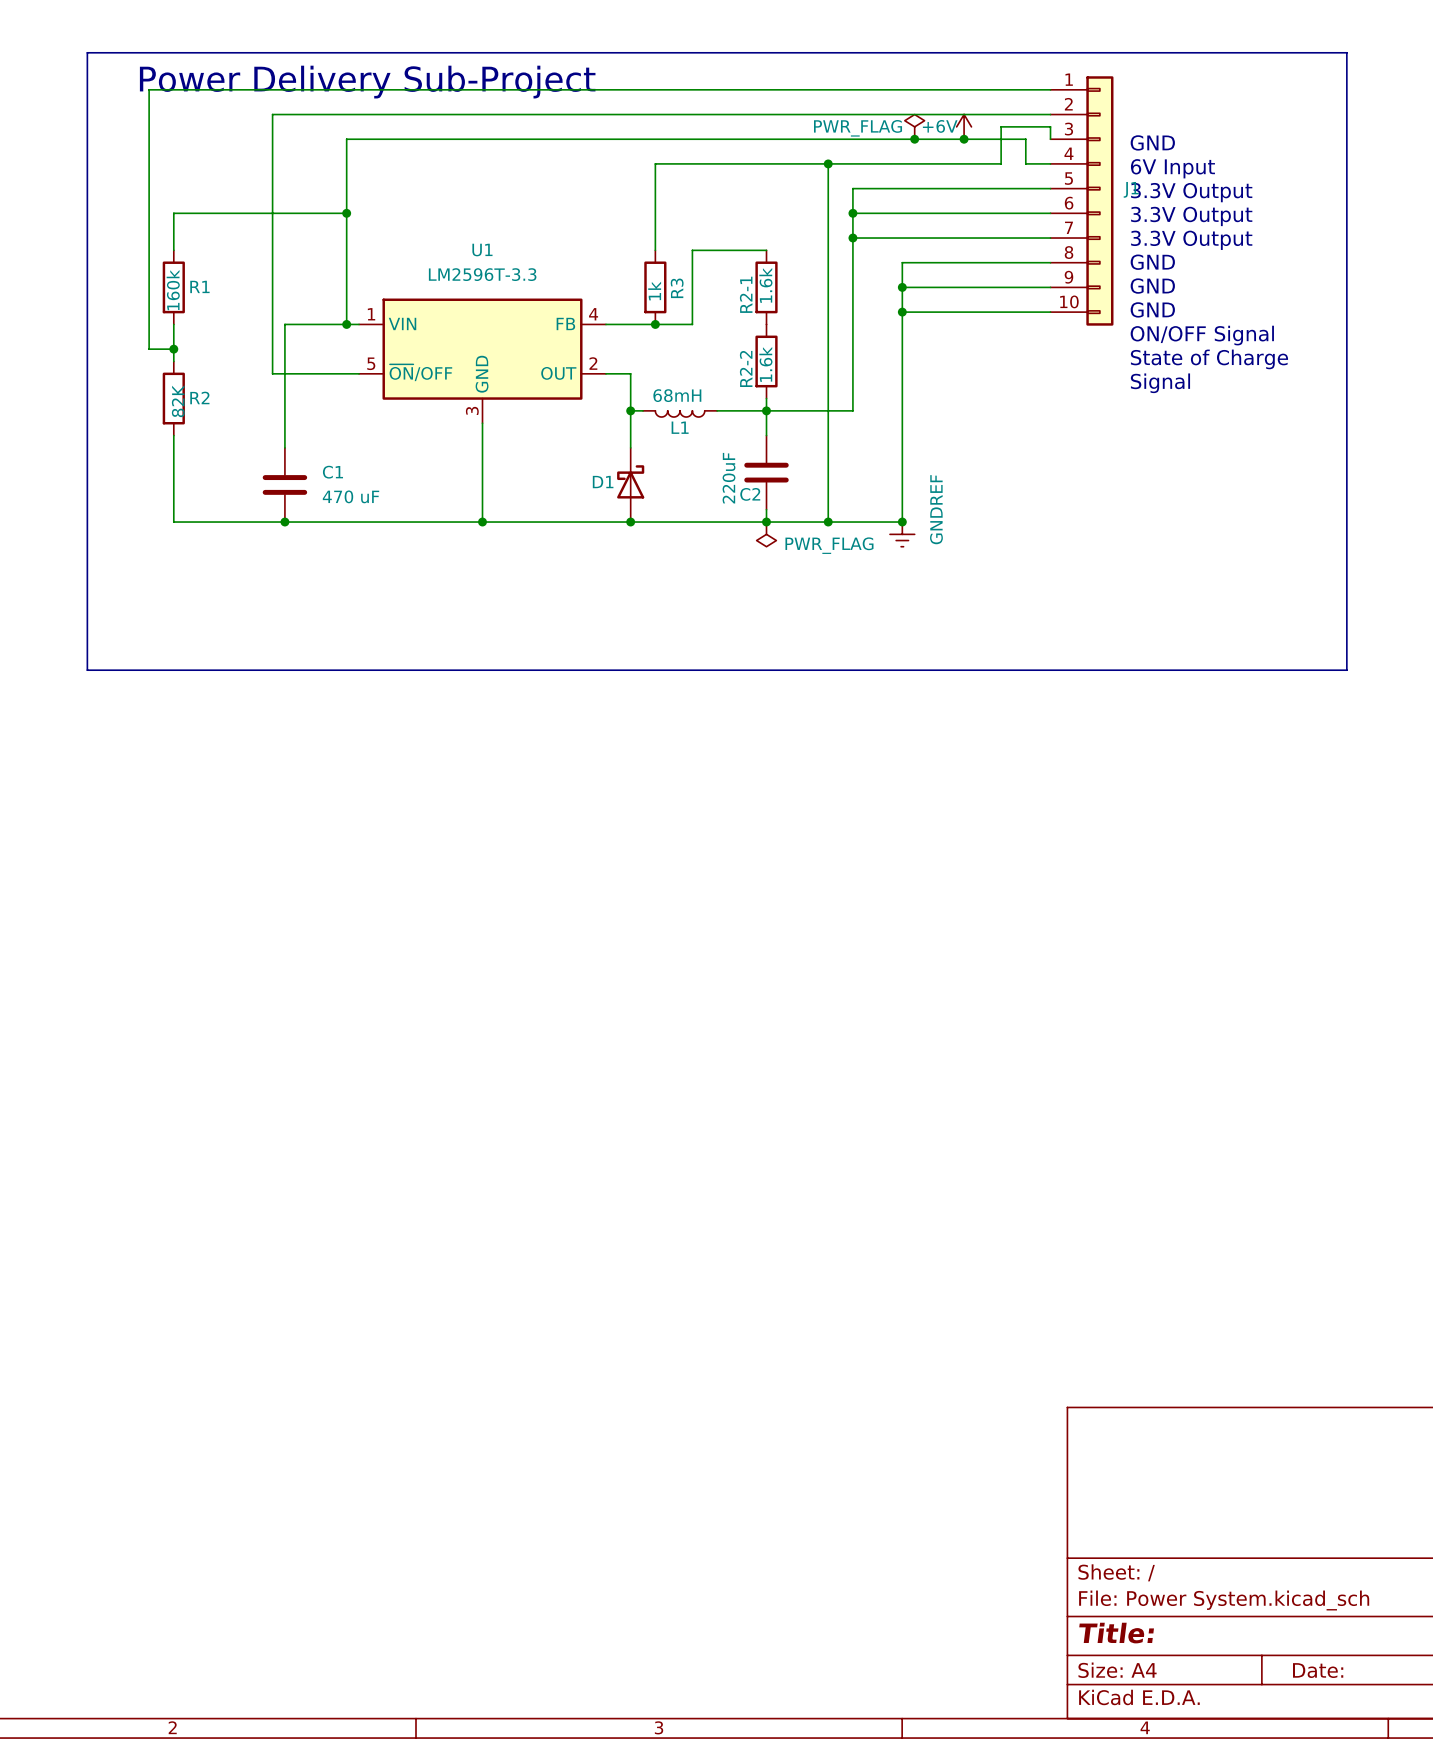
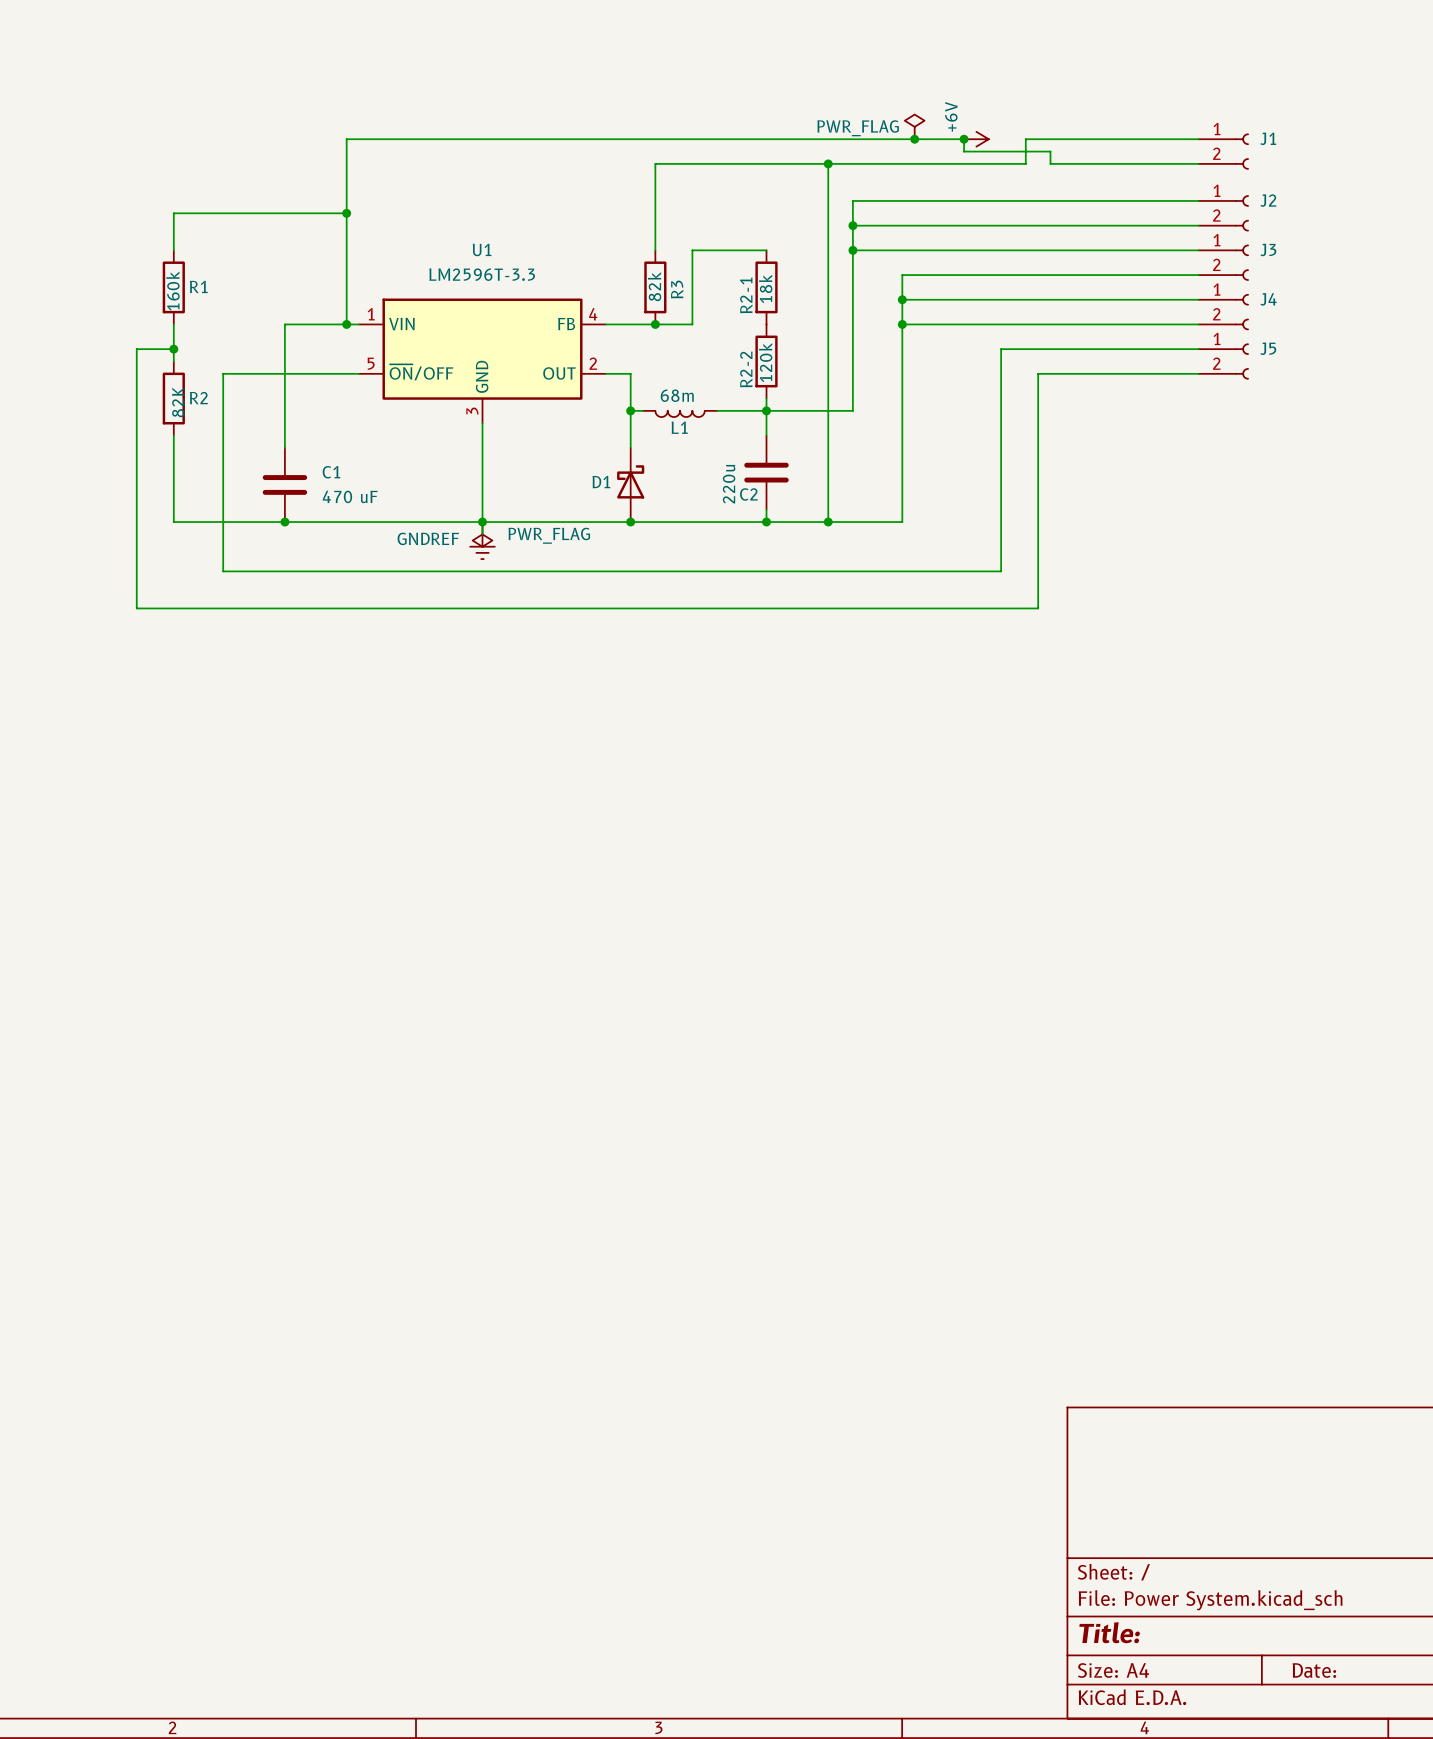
line: (87, 52) (1346, 52) (1346, 670) (87, 670) (87, 52) -> none
J1 symbol: [1050, 76, 1114, 326] -> [1198, 133, 1249, 170]
text: Power Delivery Sub-Project (367, 82) -> none
wire: (1050, 89) (149, 89) (149, 349) -> (1198, 373) (1038, 373) (1038, 608) (136, 608) (136, 349) (149, 349)
wire: (1050, 114) (272, 114) (272, 373) -> (1198, 349) (1001, 349) (1001, 571) (223, 571) (223, 373) (272, 373)
power symbol text position: +6V (940, 126) -> +6V (951, 116)
power symbol rotation: 0° (964, 126) -> 90° clockwise (976, 139)
power symbol position: +6V (964, 126) -> +6V (976, 139)
wire: (964, 139) (1025, 139) -> (964, 139) (964, 151) (1050, 151) (1050, 163) (1198, 163)
wire: none -> (1025, 139) (1198, 139)
wire: (1050, 139) (1050, 126) (1001, 126) (1001, 163) -> (1025, 163) (1001, 163)
text: GND (1152, 142) -> none
wire: (1025, 163) (1050, 163) -> none
text: 6V Input (1172, 168) -> none
wire: (1050, 188) (852, 188) (852, 200) -> (1198, 200) (852, 200)
text: 3.3V Output (1191, 192) -> none
wire: (852, 213) (1050, 213) -> none
junction: (852, 213) -> none
J2: none -> (1223, 213)
text: 3.3V Output (1191, 216) -> none
wire: none -> (852, 225) (1198, 225)
junction: none -> (852, 225)
wire: (852, 238) (1050, 238) -> none
junction: (852, 238) -> none
text: 3.3V Output (1191, 240) -> none
wire: none -> (852, 250) (1198, 250)
junction: none -> (852, 250)
wire: (1050, 262) (902, 262) (902, 275) -> (1198, 275) (902, 275)
text: GND (1152, 262) -> none
J3: none -> (1223, 262)
R2-1 value: 1.6k (765, 285) -> 18k (765, 288)
text: GND (1152, 286) -> none
wire: (902, 287) (1050, 287) -> none
junction: (902, 287) -> none
R3 value: 1k (654, 291) -> 82k (654, 286)
wire: none -> (902, 299) (1198, 299)
junction: none -> (902, 299)
text: GND (1152, 309) -> none
wire: (902, 312) (1050, 312) -> none
junction: (902, 312) -> none
J4: none -> (1223, 312)
wire: none -> (902, 324) (1198, 324)
junction: none -> (902, 324)
text: ON/OFF Signal (1202, 335) -> none
text: State of Charge (1209, 359) -> none
J5: none -> (1223, 361)
R2-2 value: 1.6k (765, 364) -> 120k (765, 362)
text: Signal (1160, 383) -> none
L1 value: 68mH (677, 395) -> 68m (677, 395)
C2 value: 220uF (729, 478) -> 220u (729, 484)
wire: none -> (482, 522) (482, 534)
junction: (902, 522) -> none
power symbol: none -> PWR_FLAG (482, 534)
power symbol: PWR_FLAG (766, 534) -> none
power symbol: GNDREF (902, 534) -> none
power symbol: none -> GNDREF (482, 546)

